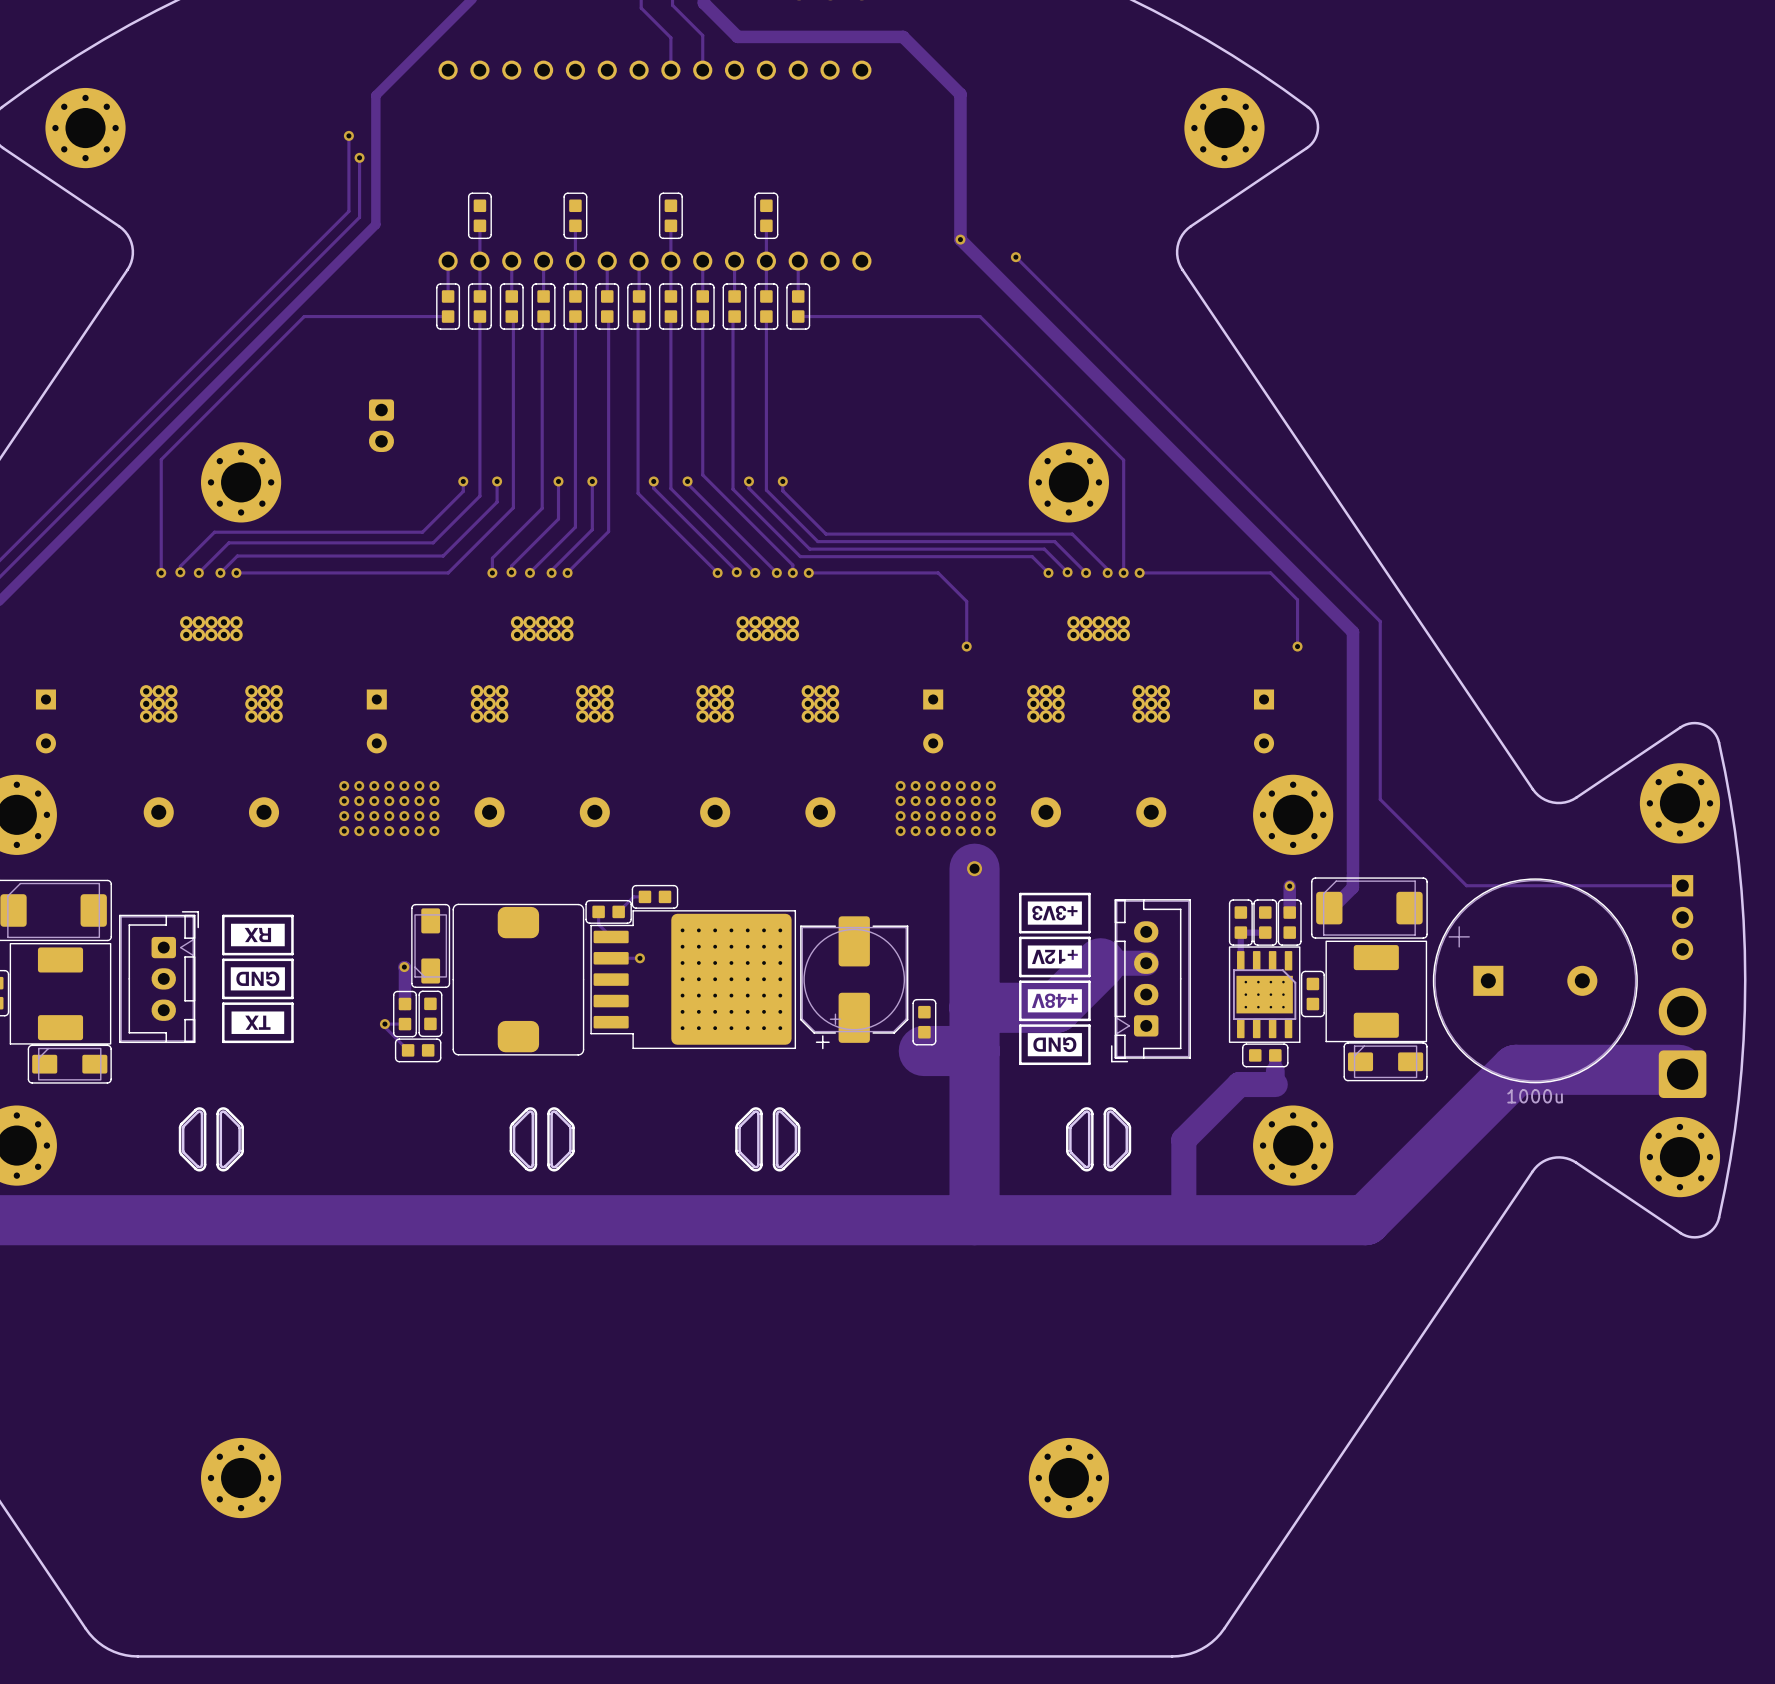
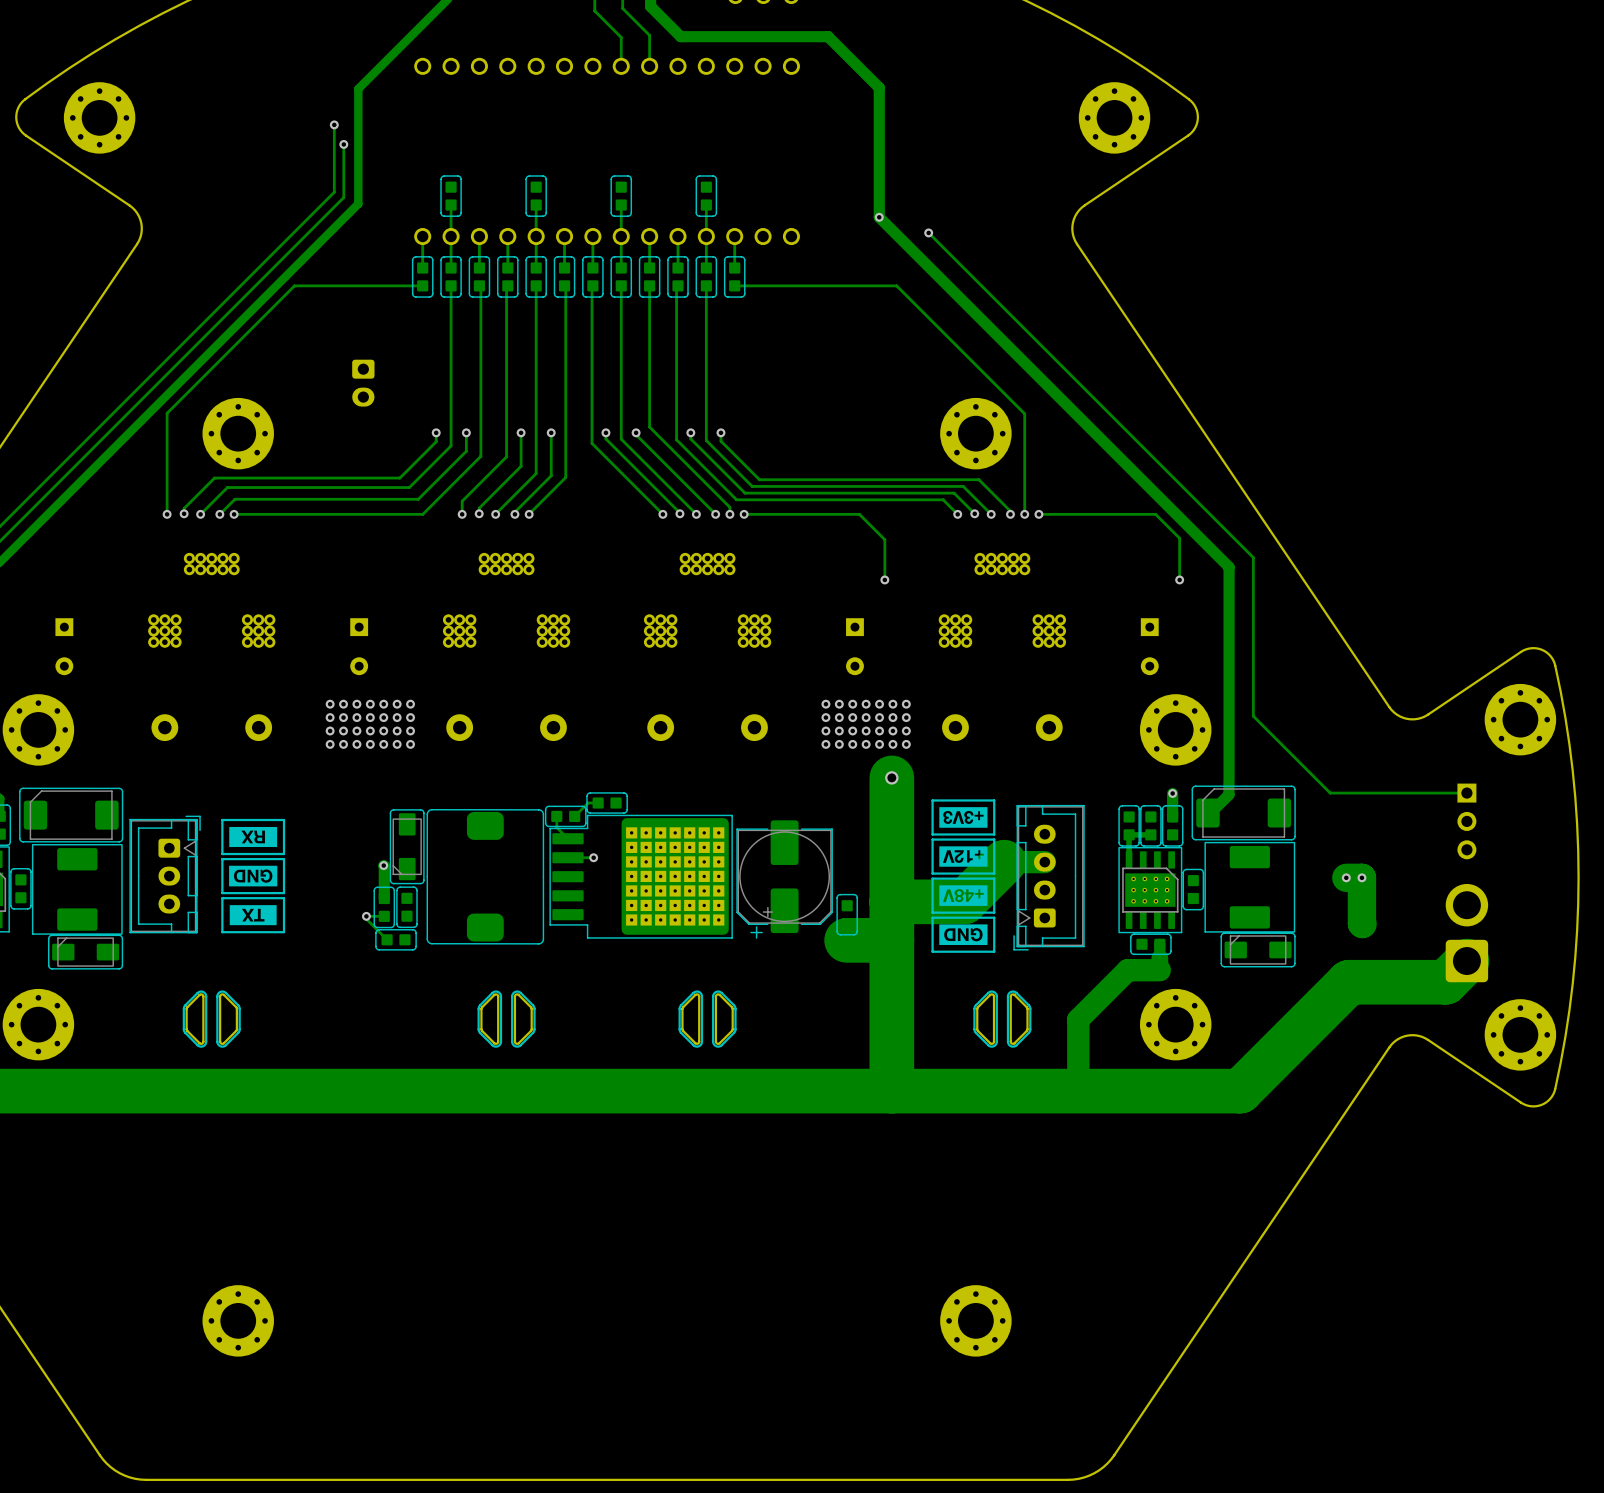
track: (1682, 885) (1619, 885) -> none
part position: (1682, 917) -> (1466, 821)
track: none -> (1346, 877) (1361, 877) (1362, 924)
via: none -> (1346, 877)
via: none -> (1361, 877)
part: 1000u (1535, 980) -> none
part position: (1682, 1042) -> (1466, 933)
track: (1678, 1069) (1515, 1069) (1487, 1098) -> (1466, 961) (1445, 982) (1349, 982)

